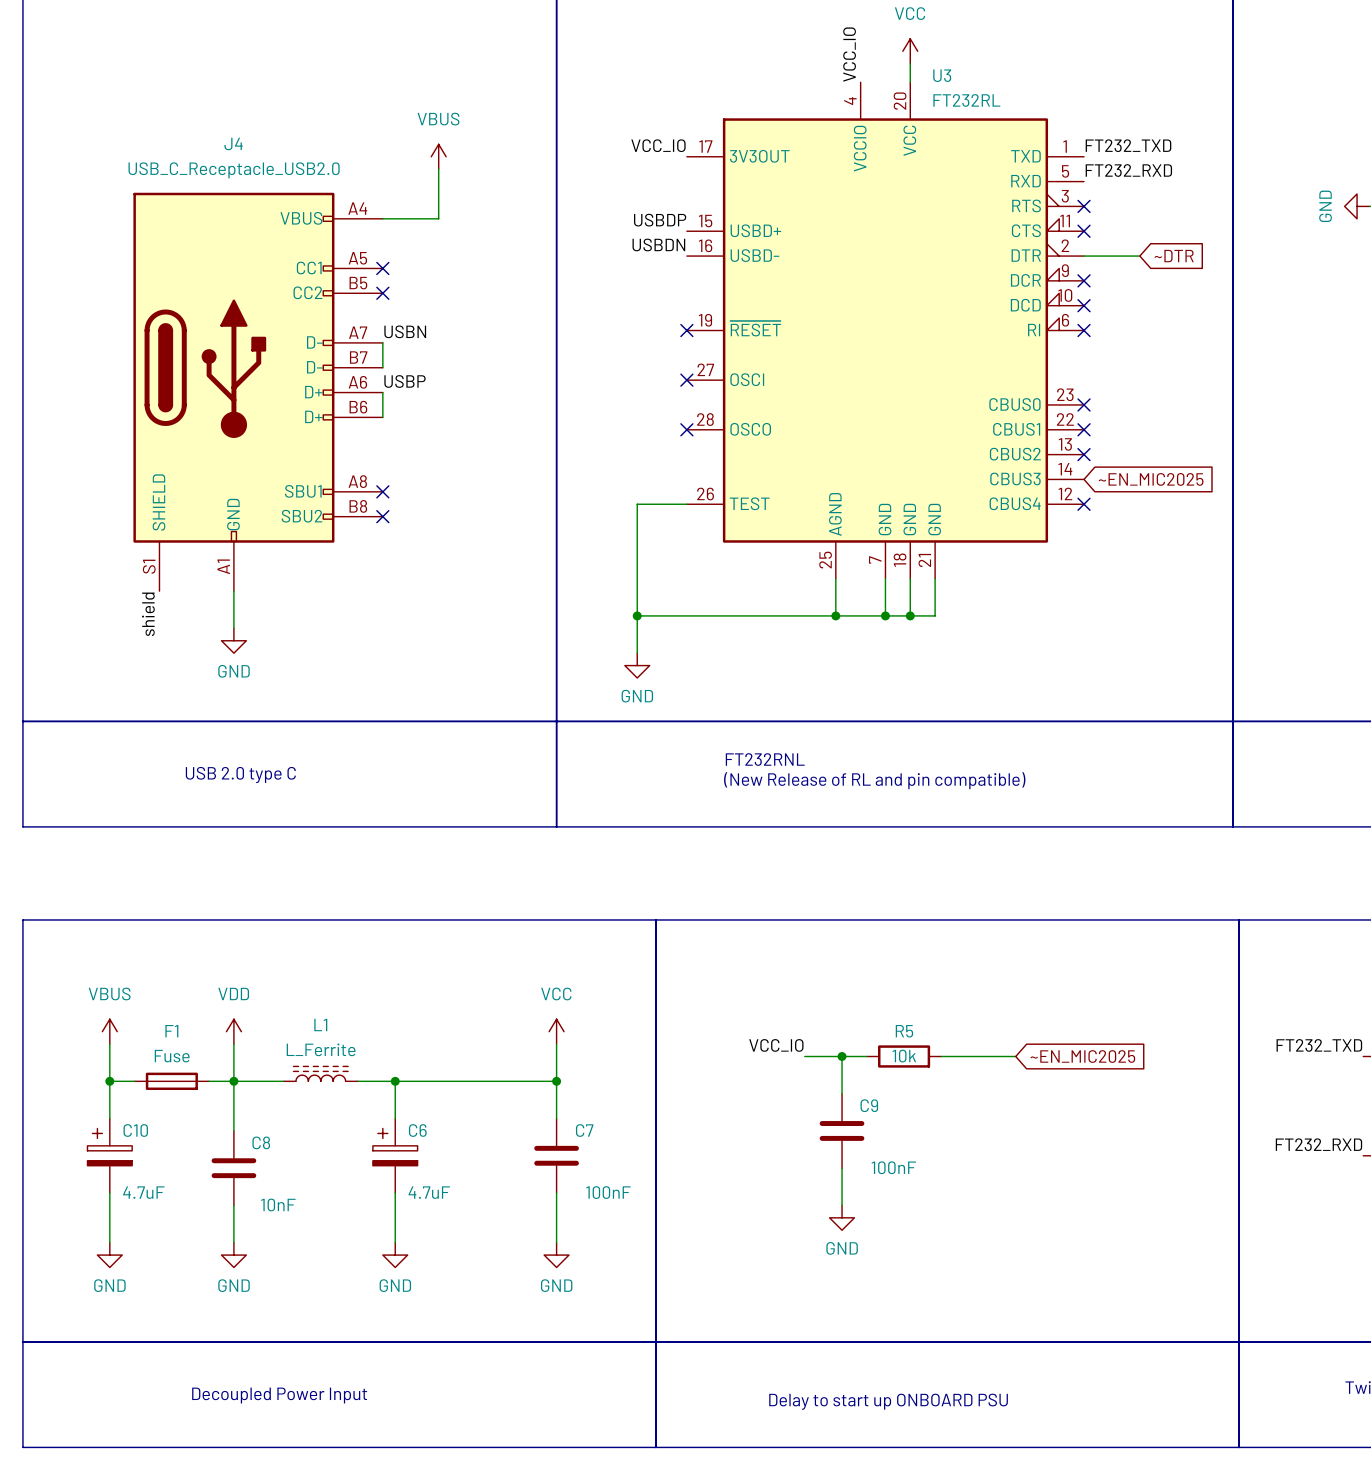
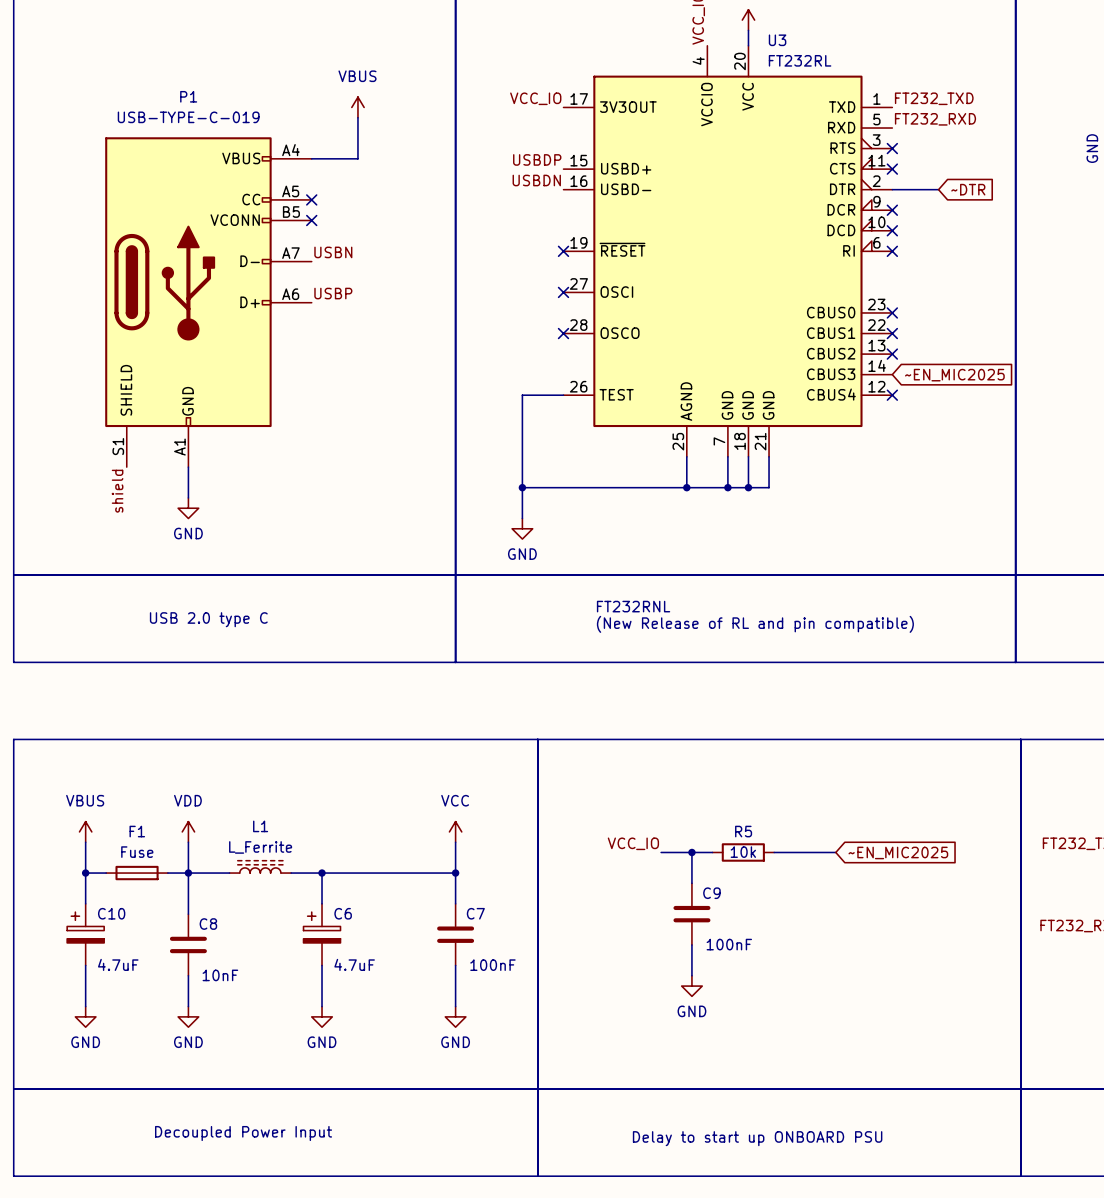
wire: (382, 342) (382, 367) -> none
J4: USB_C_Receptacle_USB2.0 (258, 391) -> none
P1: none -> USB-TYPE-C-019 (208, 302)
wire: (382, 392) (382, 417) -> none
no-connect mark: (382, 491) -> none
no-connect mark: (382, 516) -> none

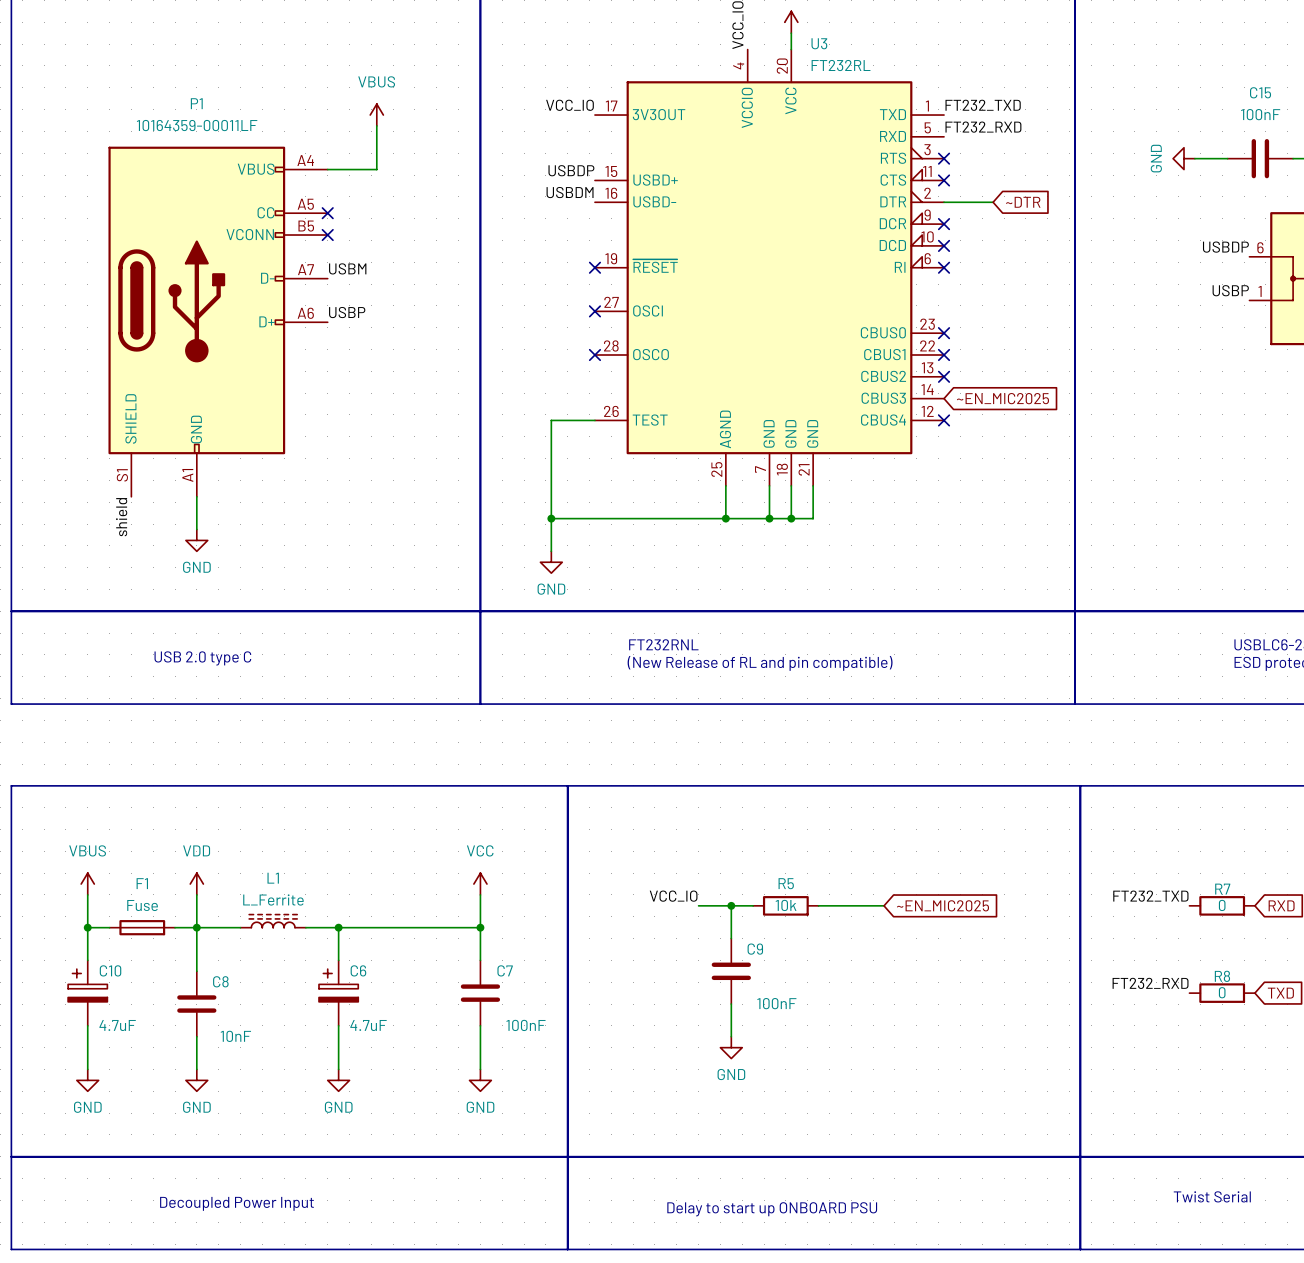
P1 value: USB-TYPE-C-019 (188, 117) -> 10164359-00011LF (197, 125)
label: USBDN (536, 180) -> USBDM (570, 192)
label: USBN (333, 252) -> USBM (347, 268)

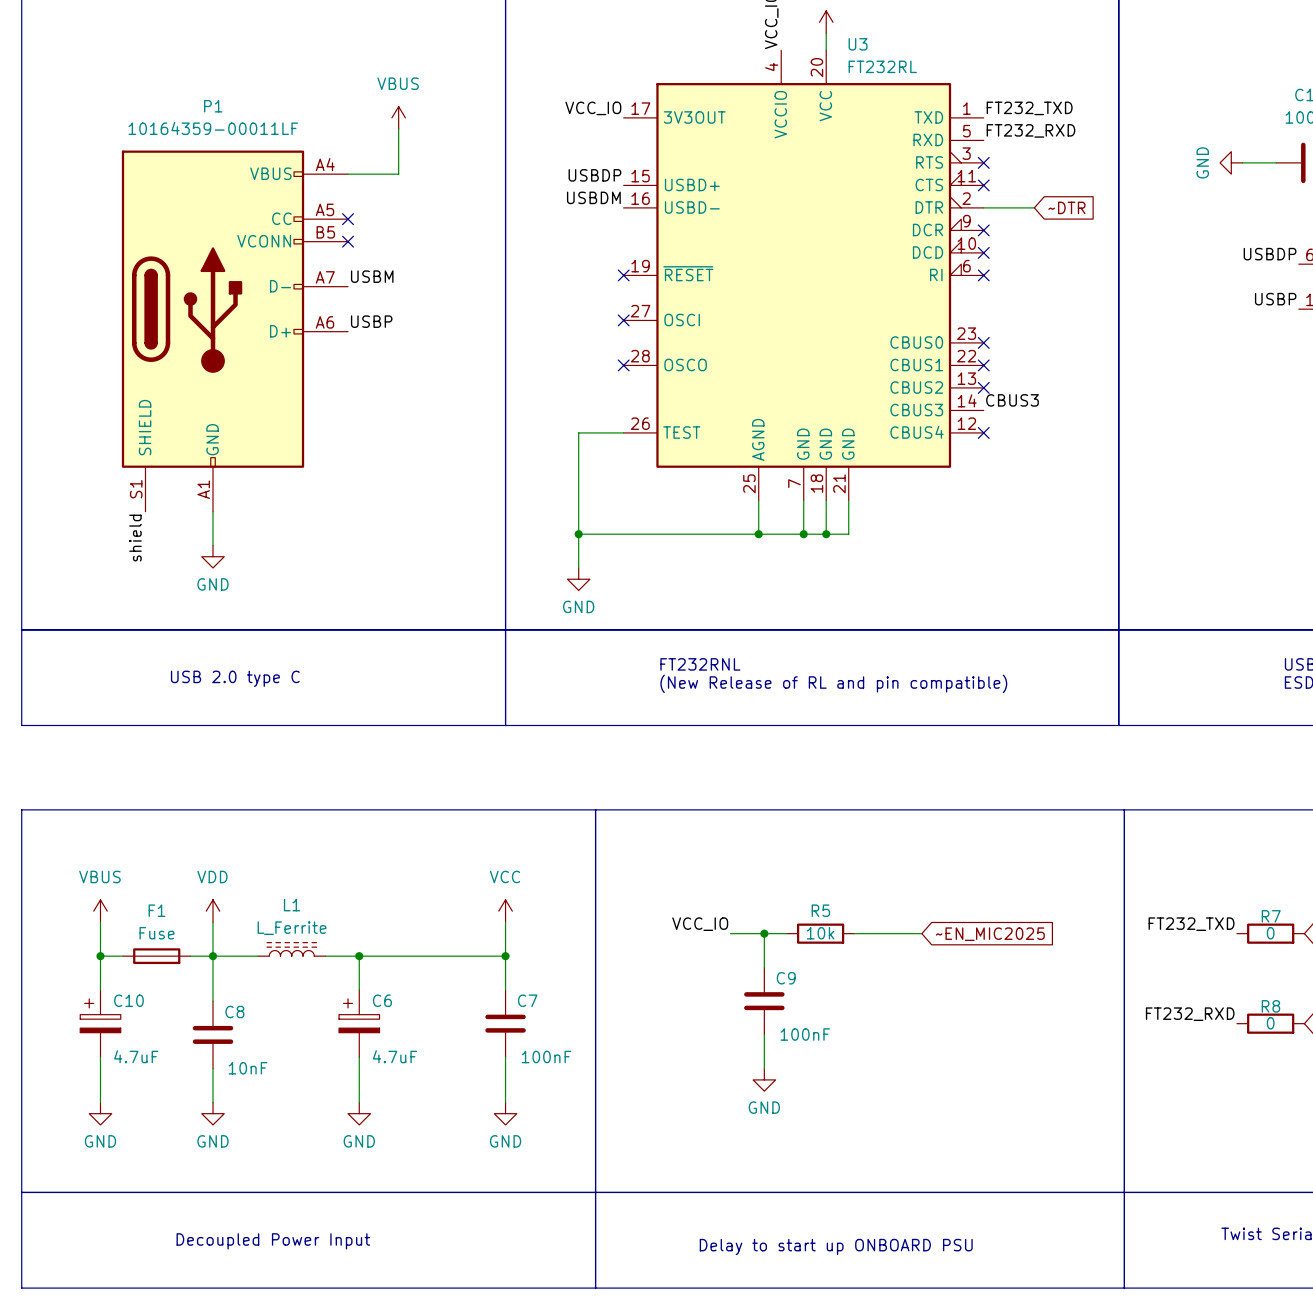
label: none -> CBUS3 (1012, 400)
global label: ~EN_MIC2025 (1002, 398) -> none

